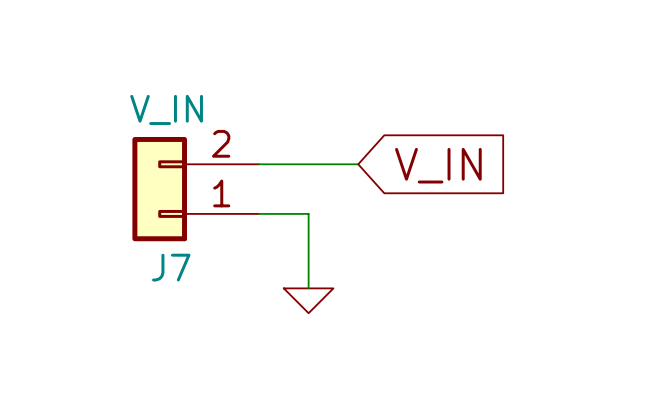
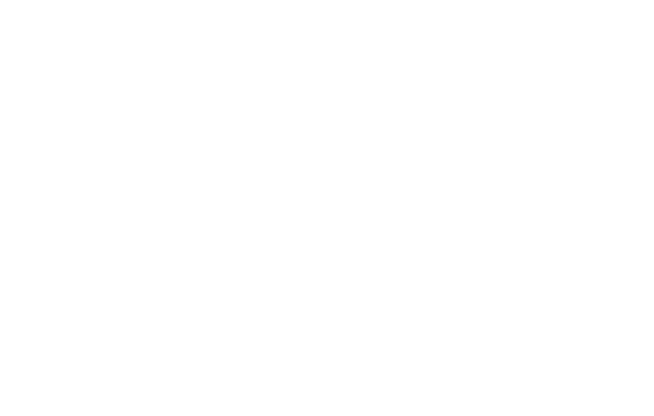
wire: (258, 164) (358, 164) -> none
global label: V_IN (438, 165) -> none
J7: V_IN (195, 189) -> none
wire: (258, 213) (308, 213) (308, 288) -> none
power symbol: (308, 300) -> none

